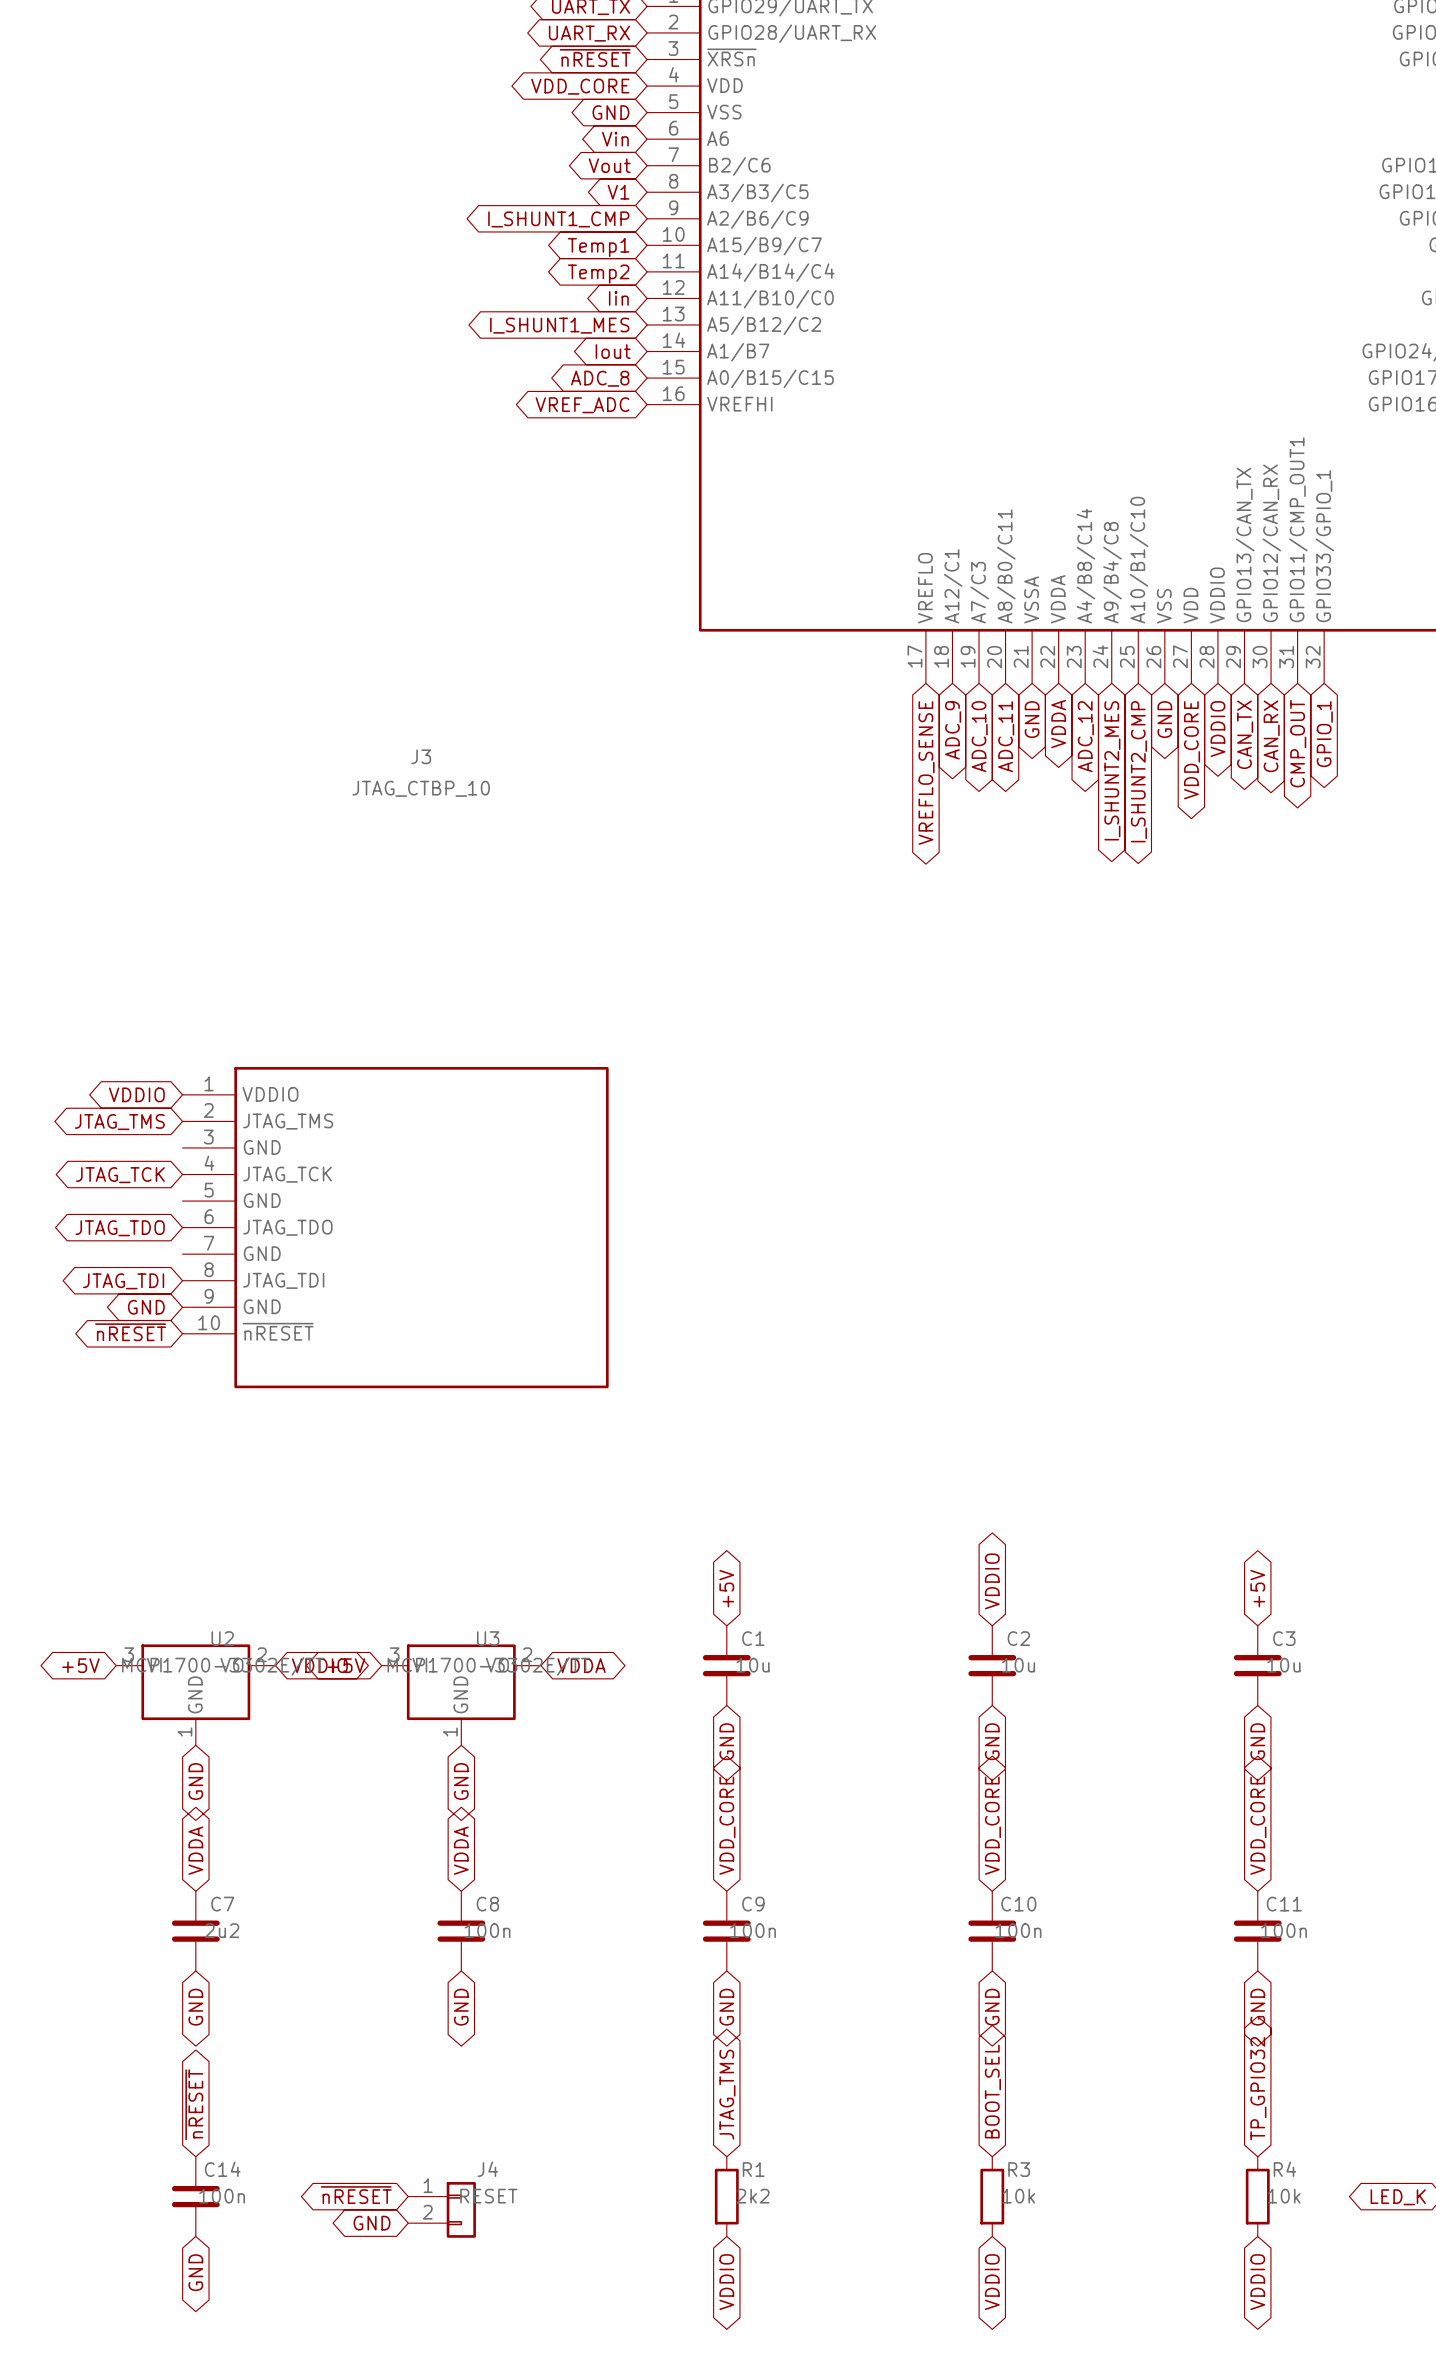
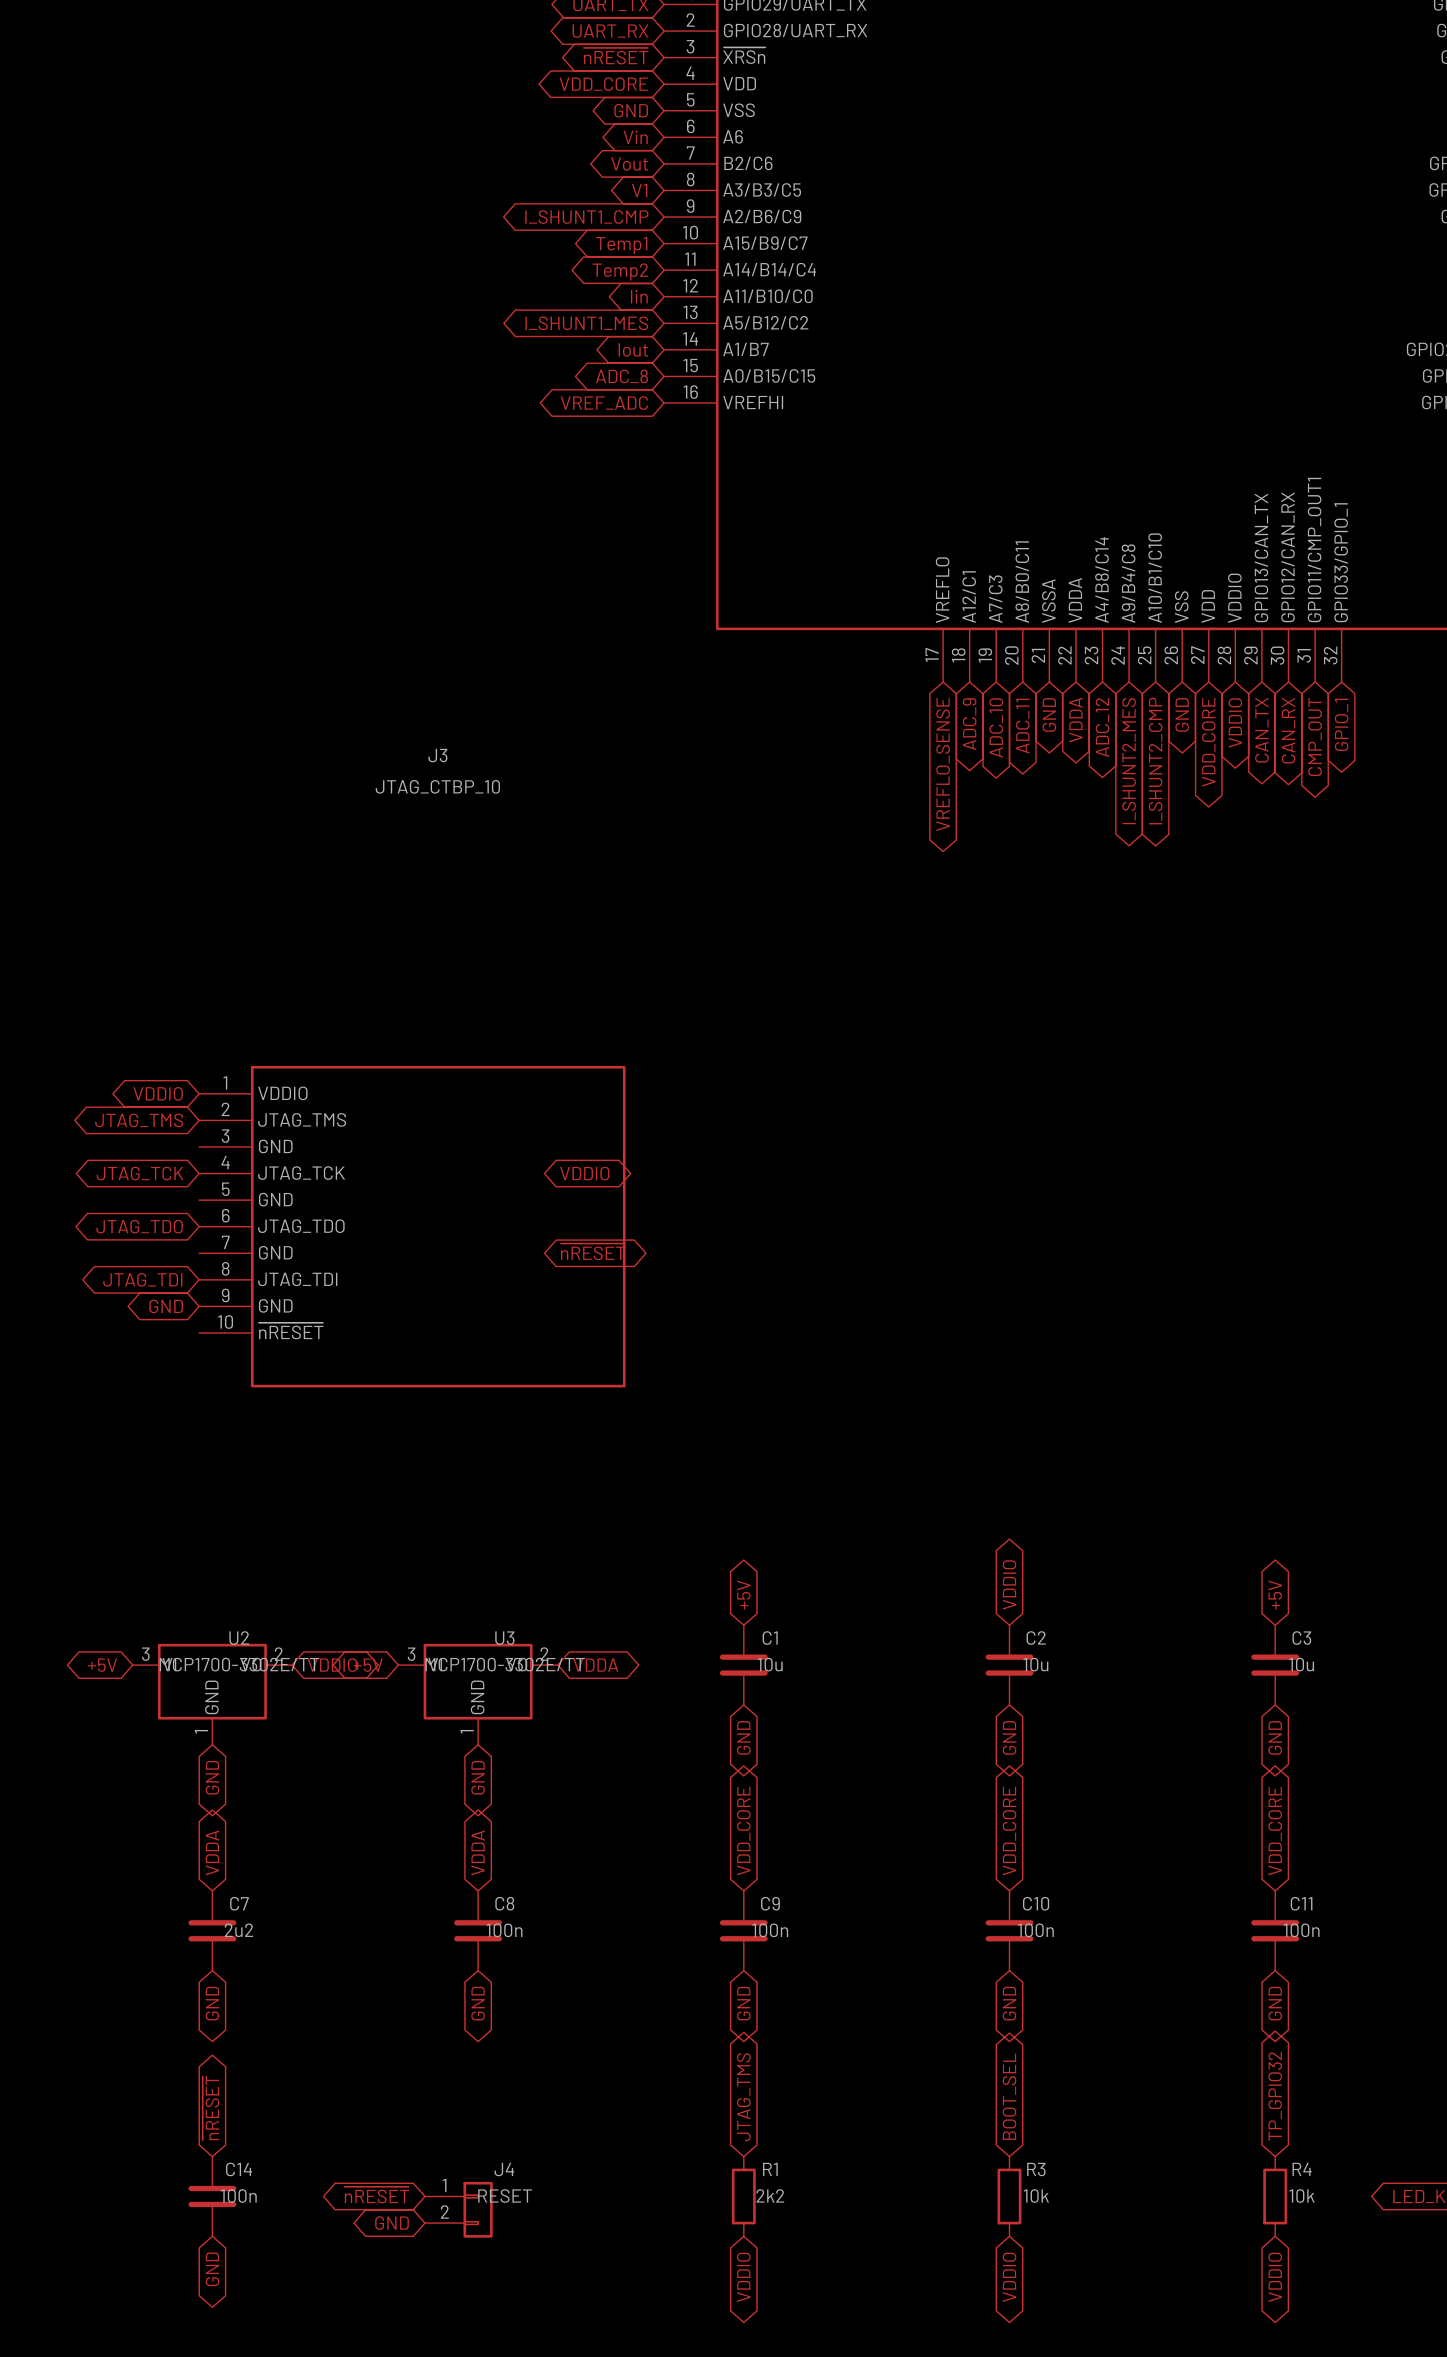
global label: none -> VDDIO (584, 1173)
global label: none -> ~{nRESET} (593, 1251)
global label: ~{nRESET} (130, 1332) -> none

